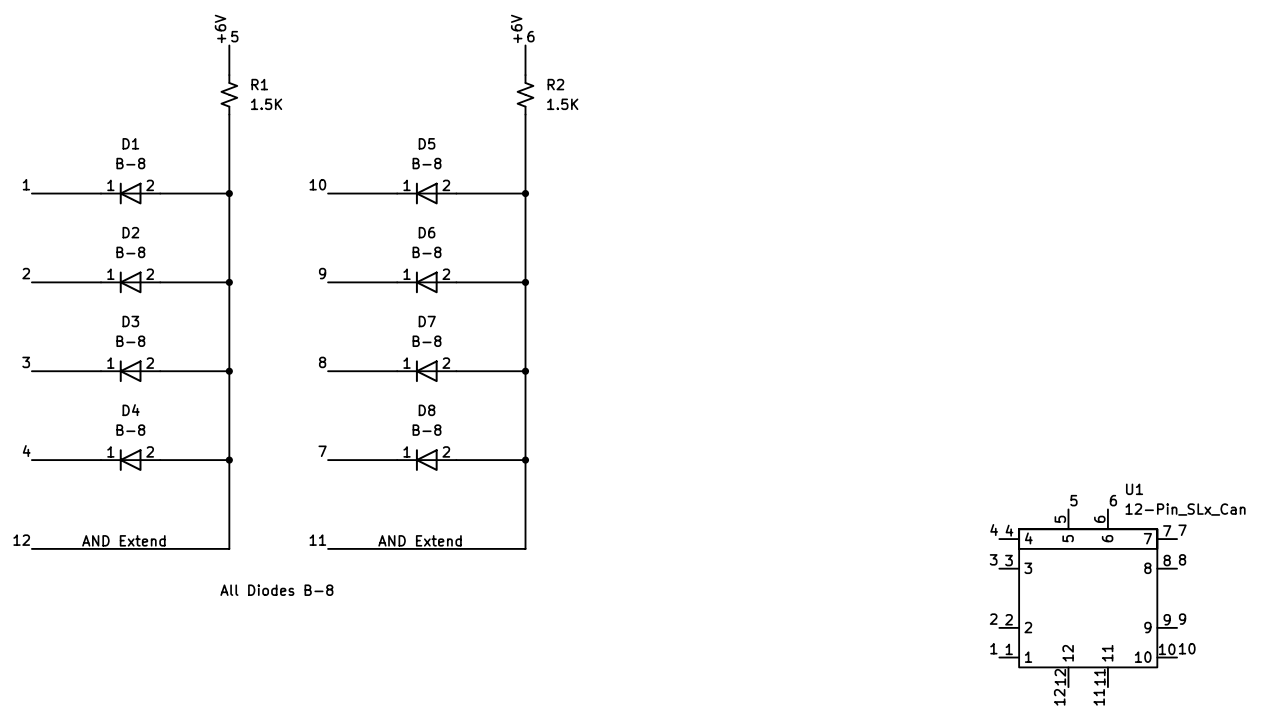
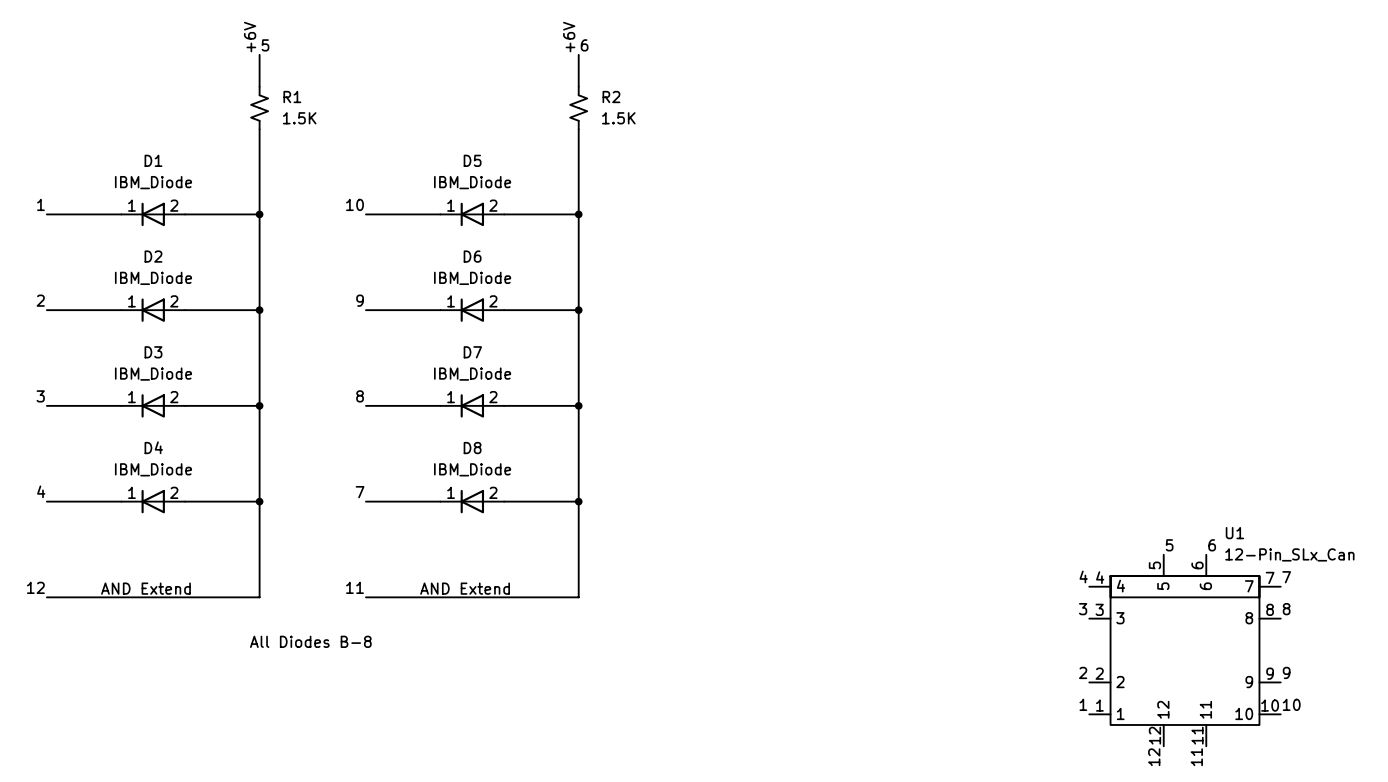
D1 value: B-8 (130, 163) -> IBM_Diode (153, 182)
D5 value: B-8 (427, 163) -> IBM_Diode (472, 182)
D2 value: B-8 (130, 252) -> IBM_Diode (153, 278)
D6 value: B-8 (427, 252) -> IBM_Diode (472, 278)
D3 value: B-8 (130, 341) -> IBM_Diode (153, 374)
D7 value: B-8 (427, 341) -> IBM_Diode (472, 374)
D4 value: B-8 (130, 430) -> IBM_Diode (153, 469)
D8 value: B-8 (427, 430) -> IBM_Diode (472, 469)

